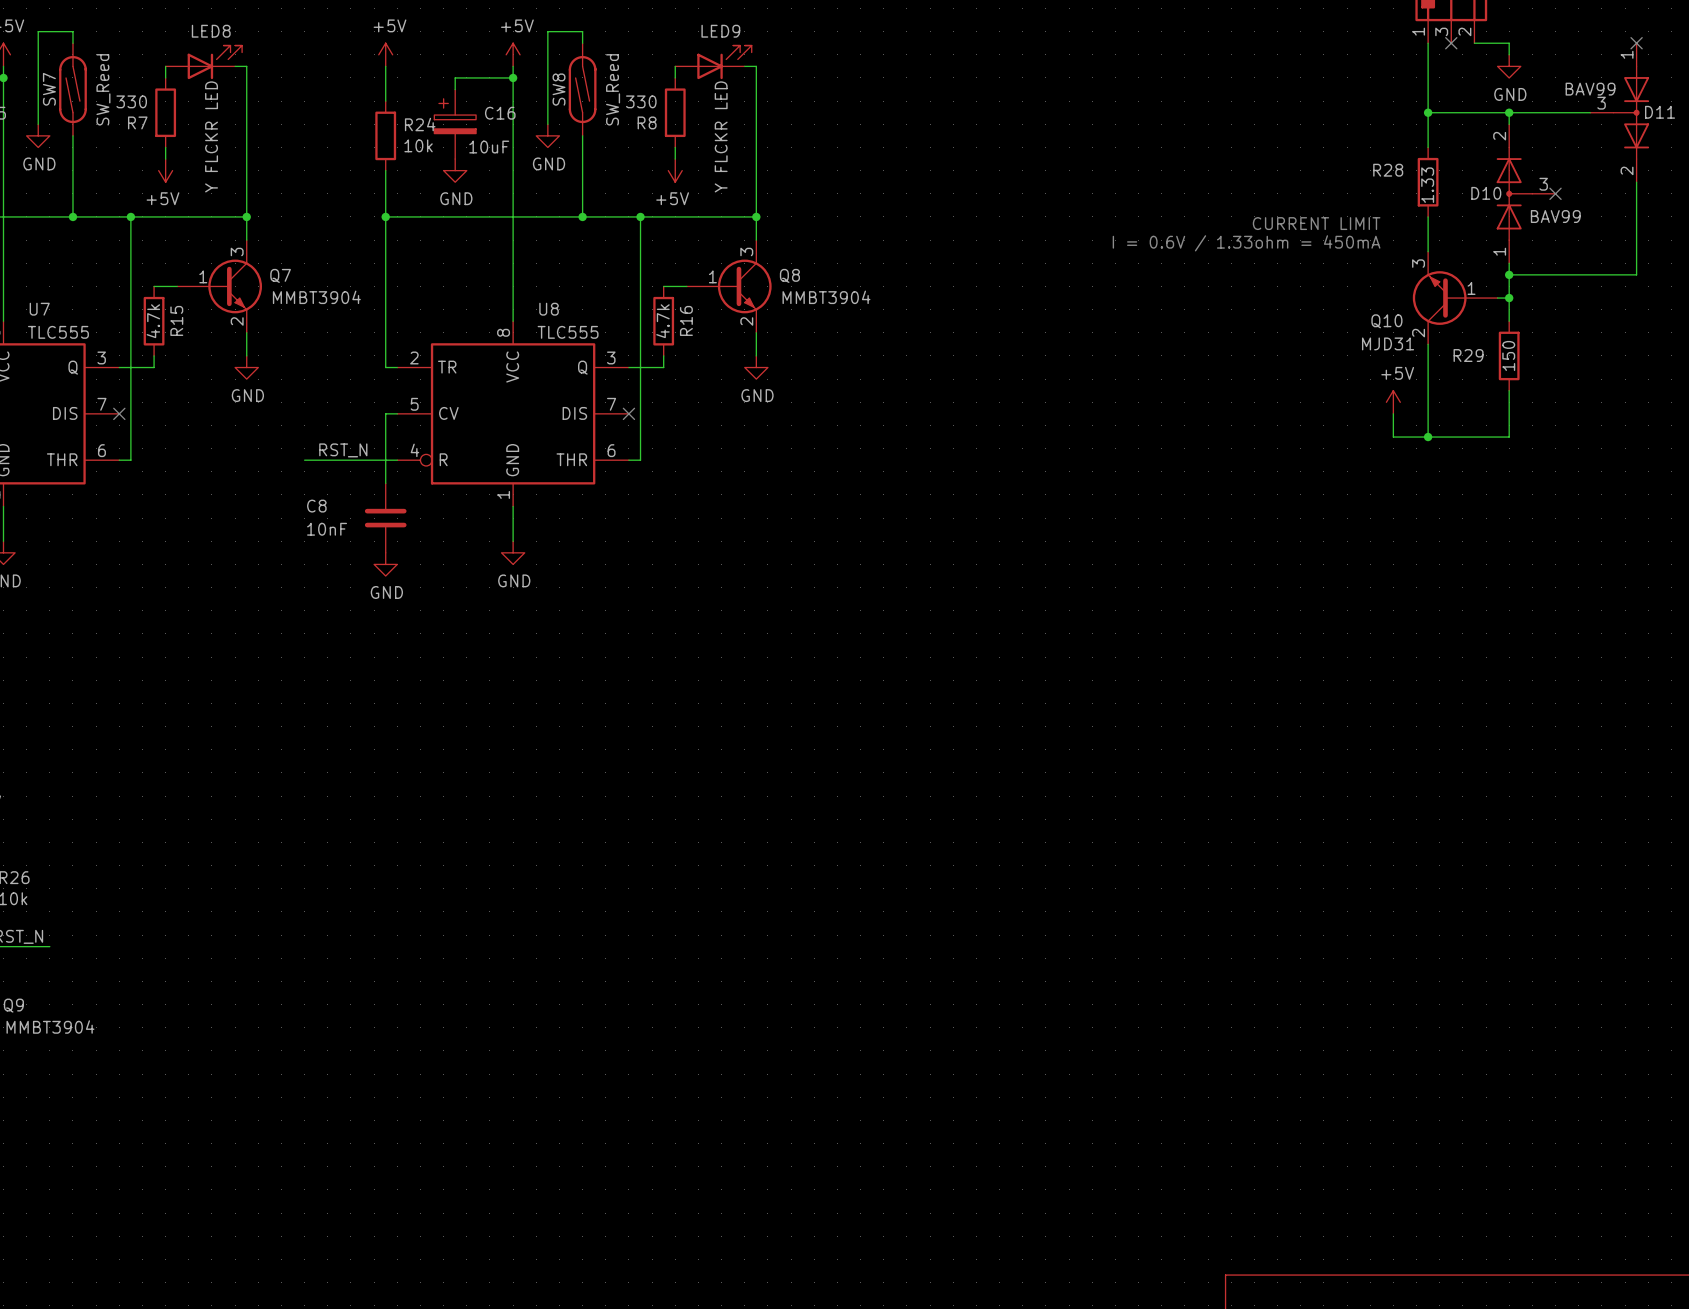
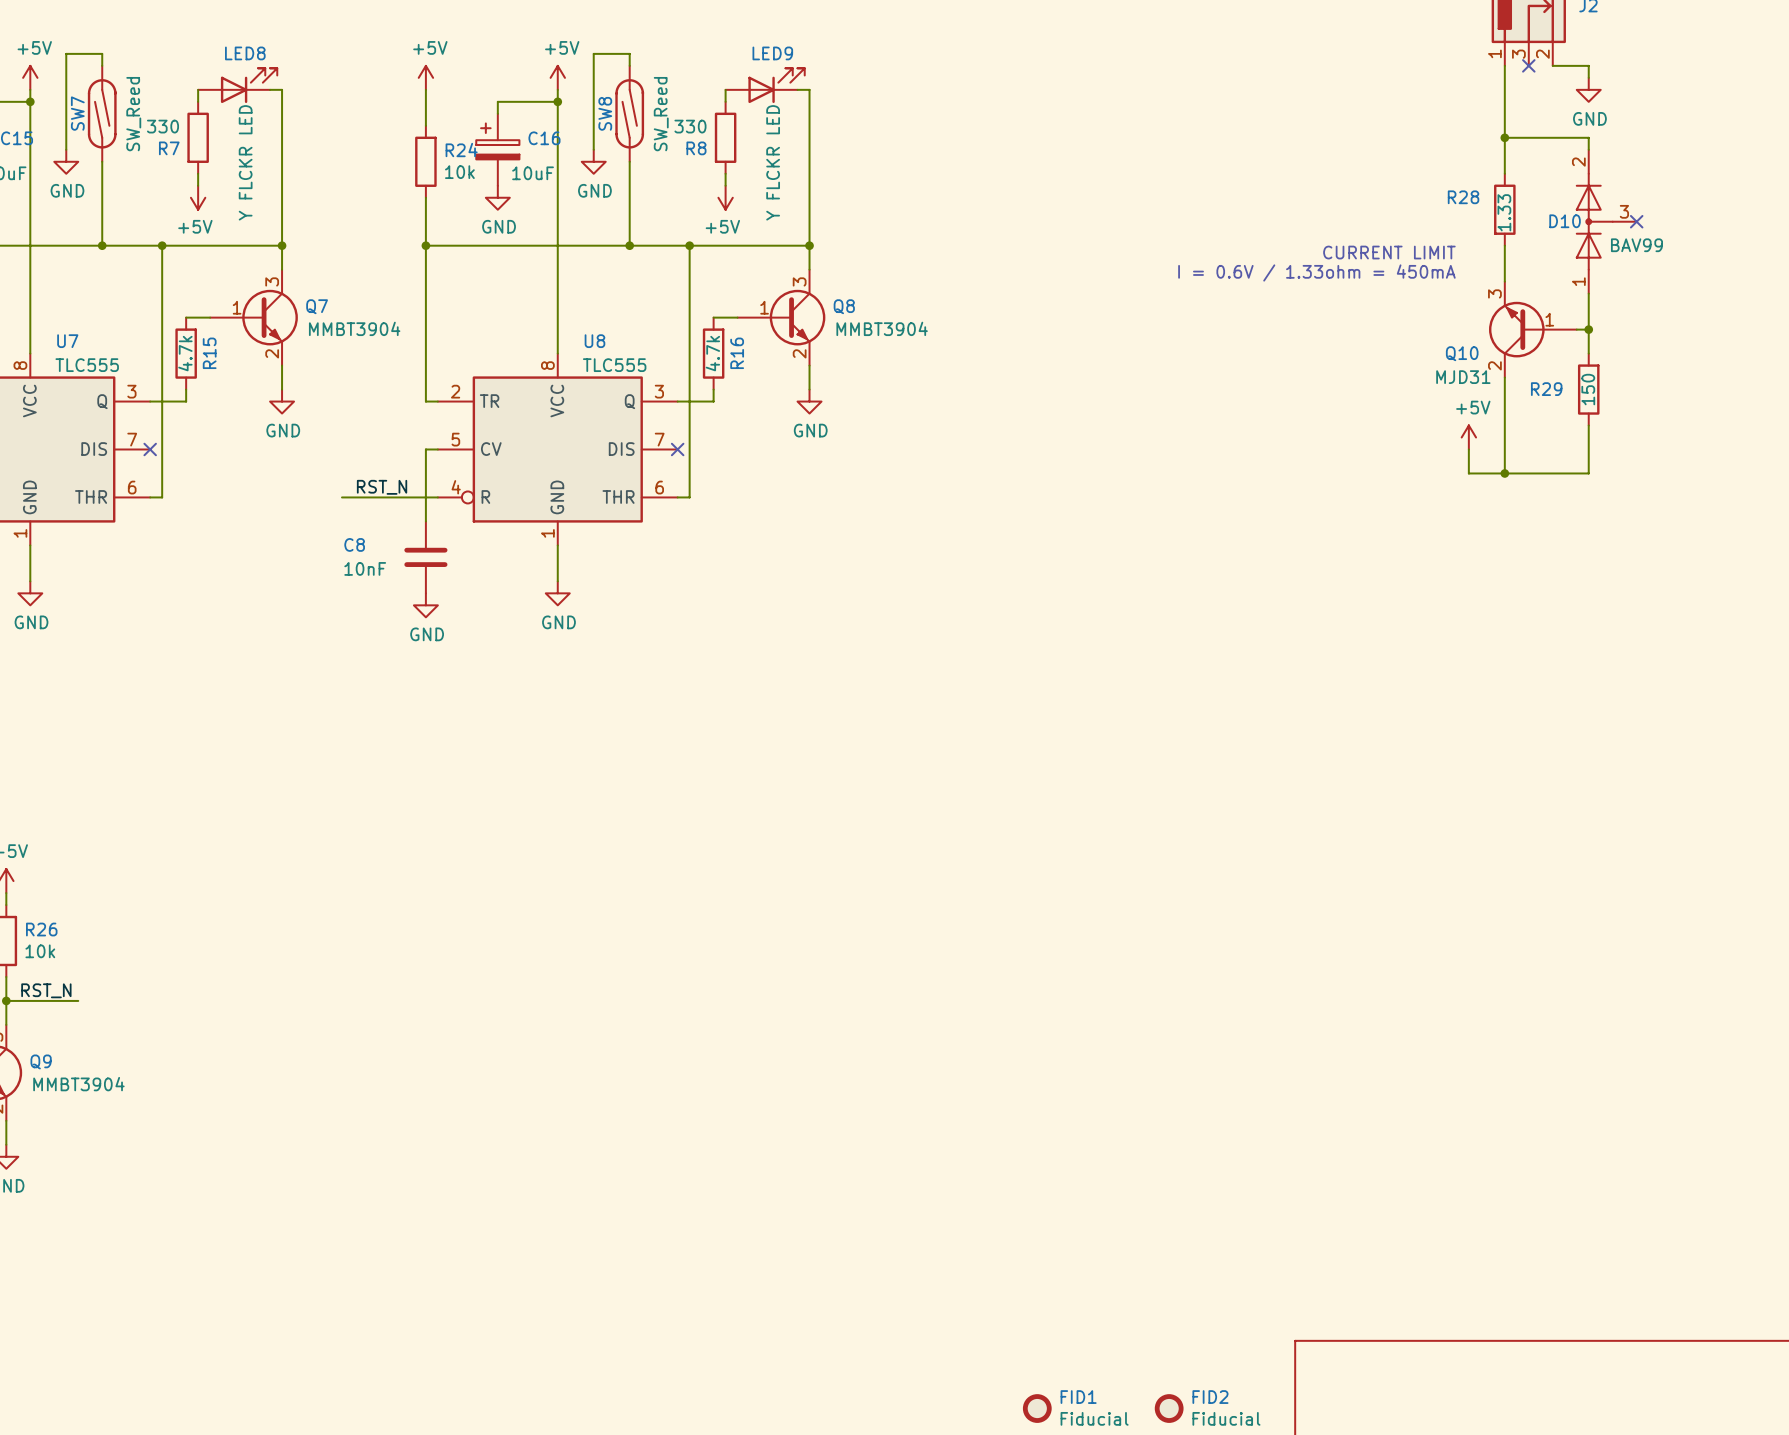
no-connect mark: (1636, 43) -> none
wire: (1509, 112) (1590, 112) -> none
junction: (1509, 112) -> none
D11: BAV99 (1619, 112) -> none
wire: (1636, 182) (1636, 274) (1509, 274) -> none
junction: (1509, 274) -> none

